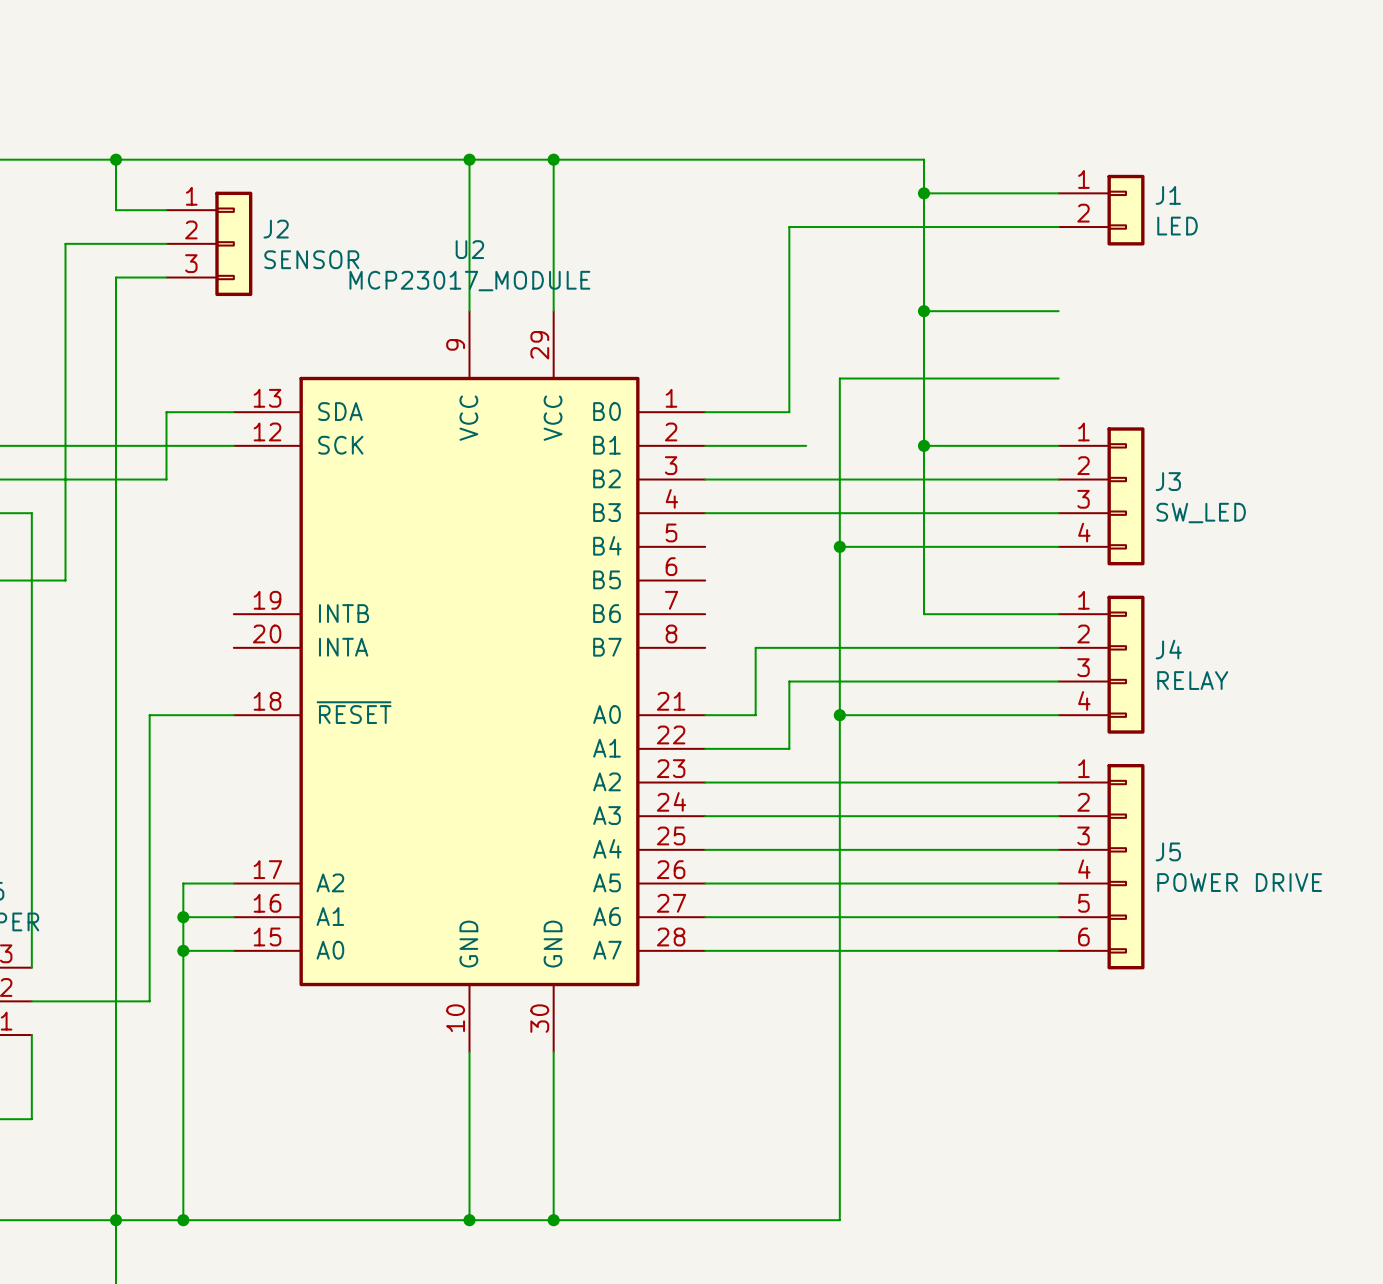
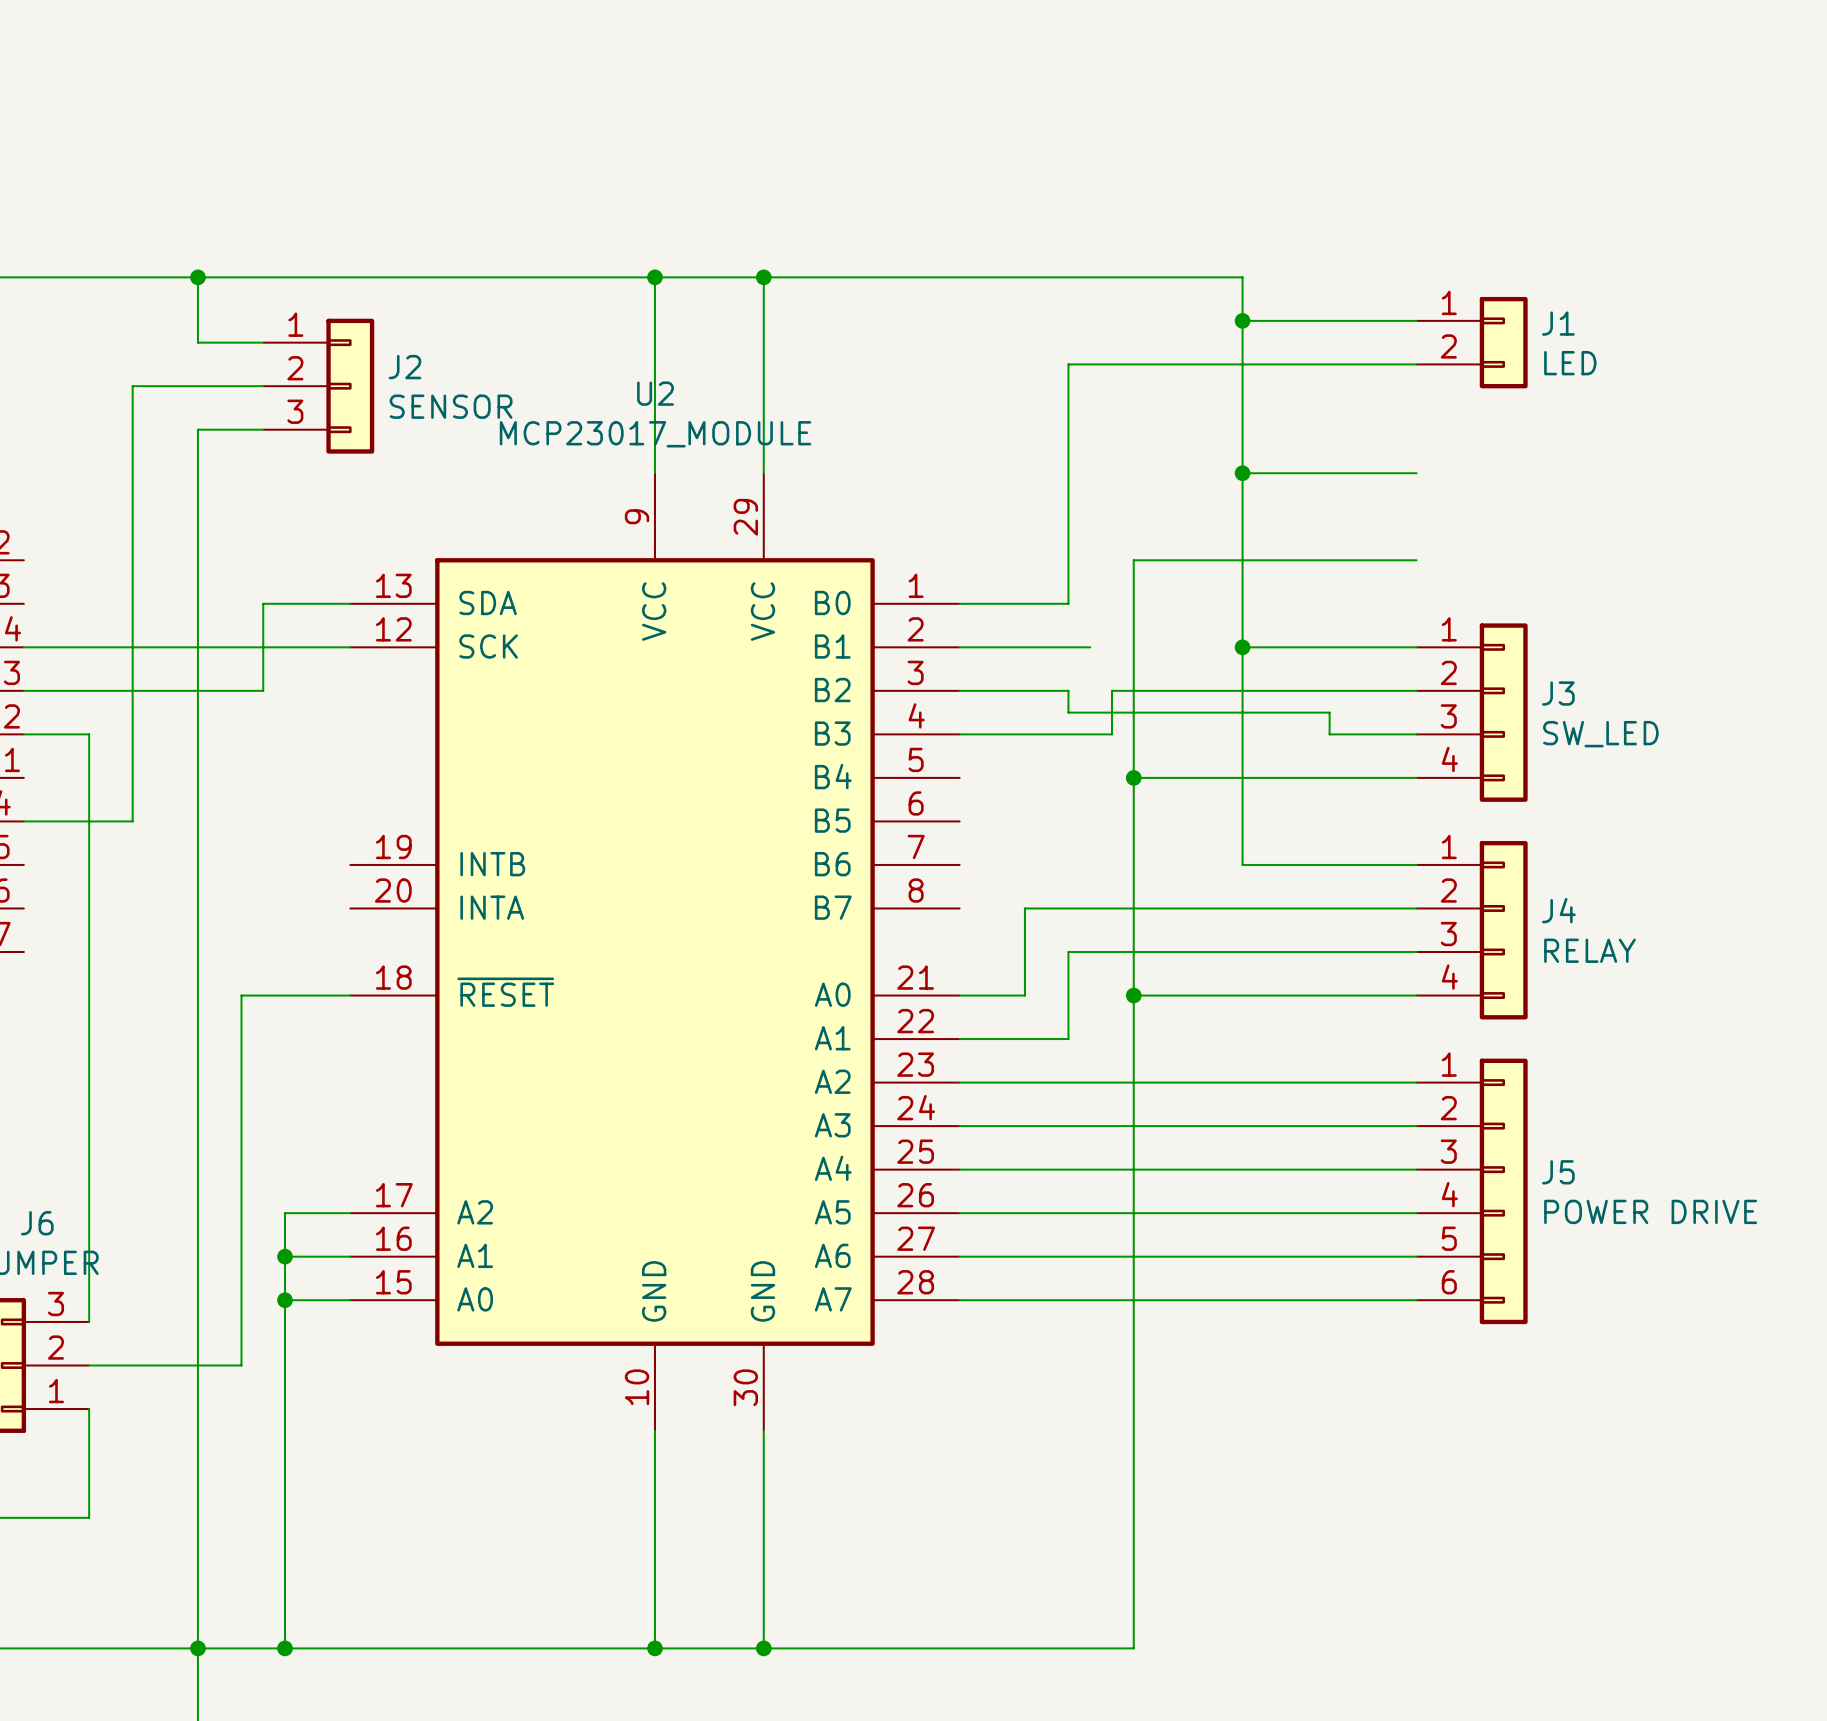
wire: (789, 479) (823, 479) -> (1111, 734) (1111, 690)
wire: (823, 513) (991, 513) -> (1068, 690) (1068, 712) (1329, 712) (1329, 734)

